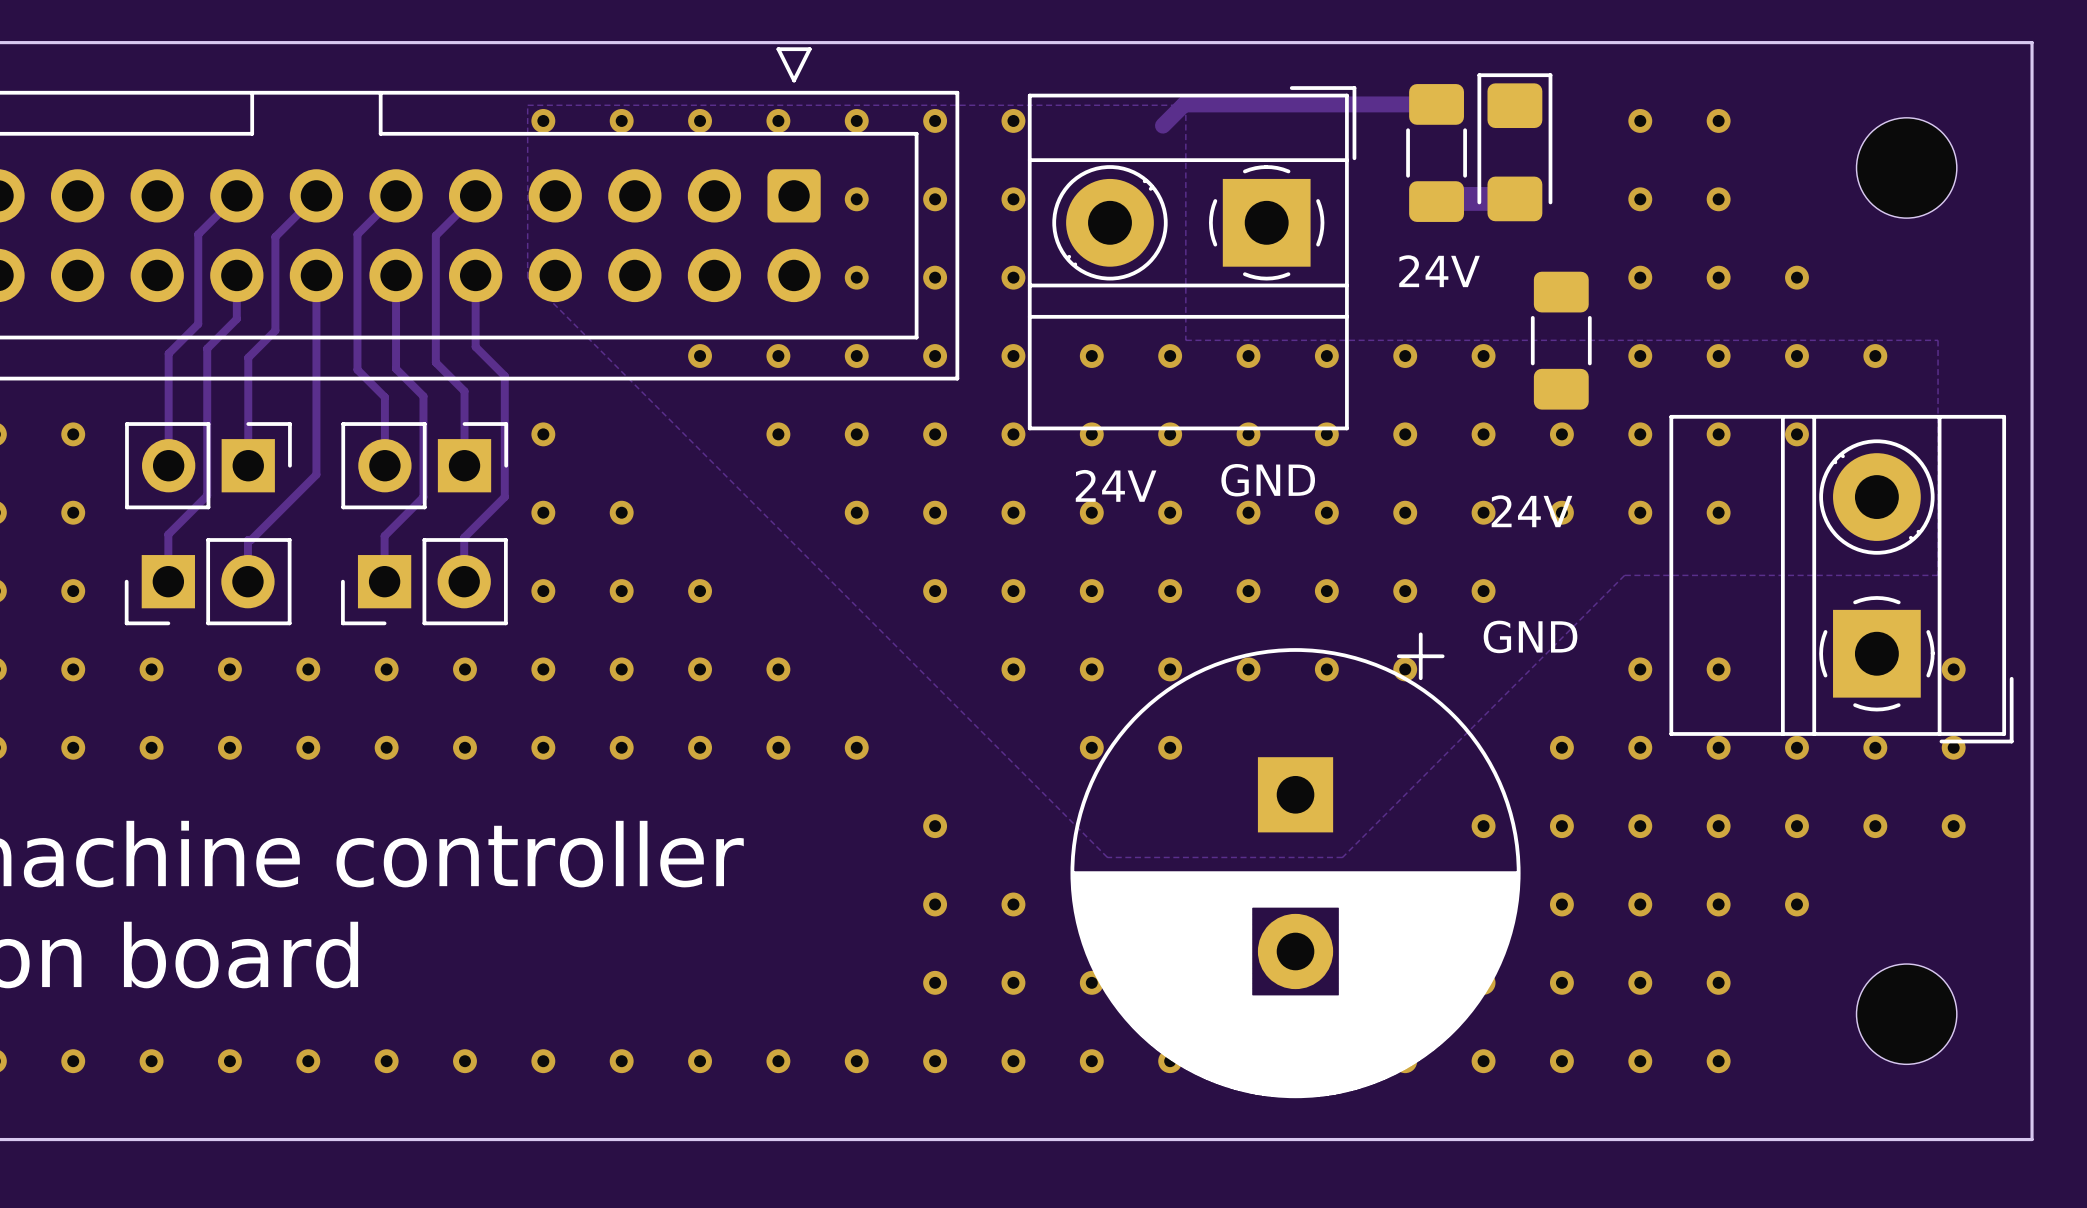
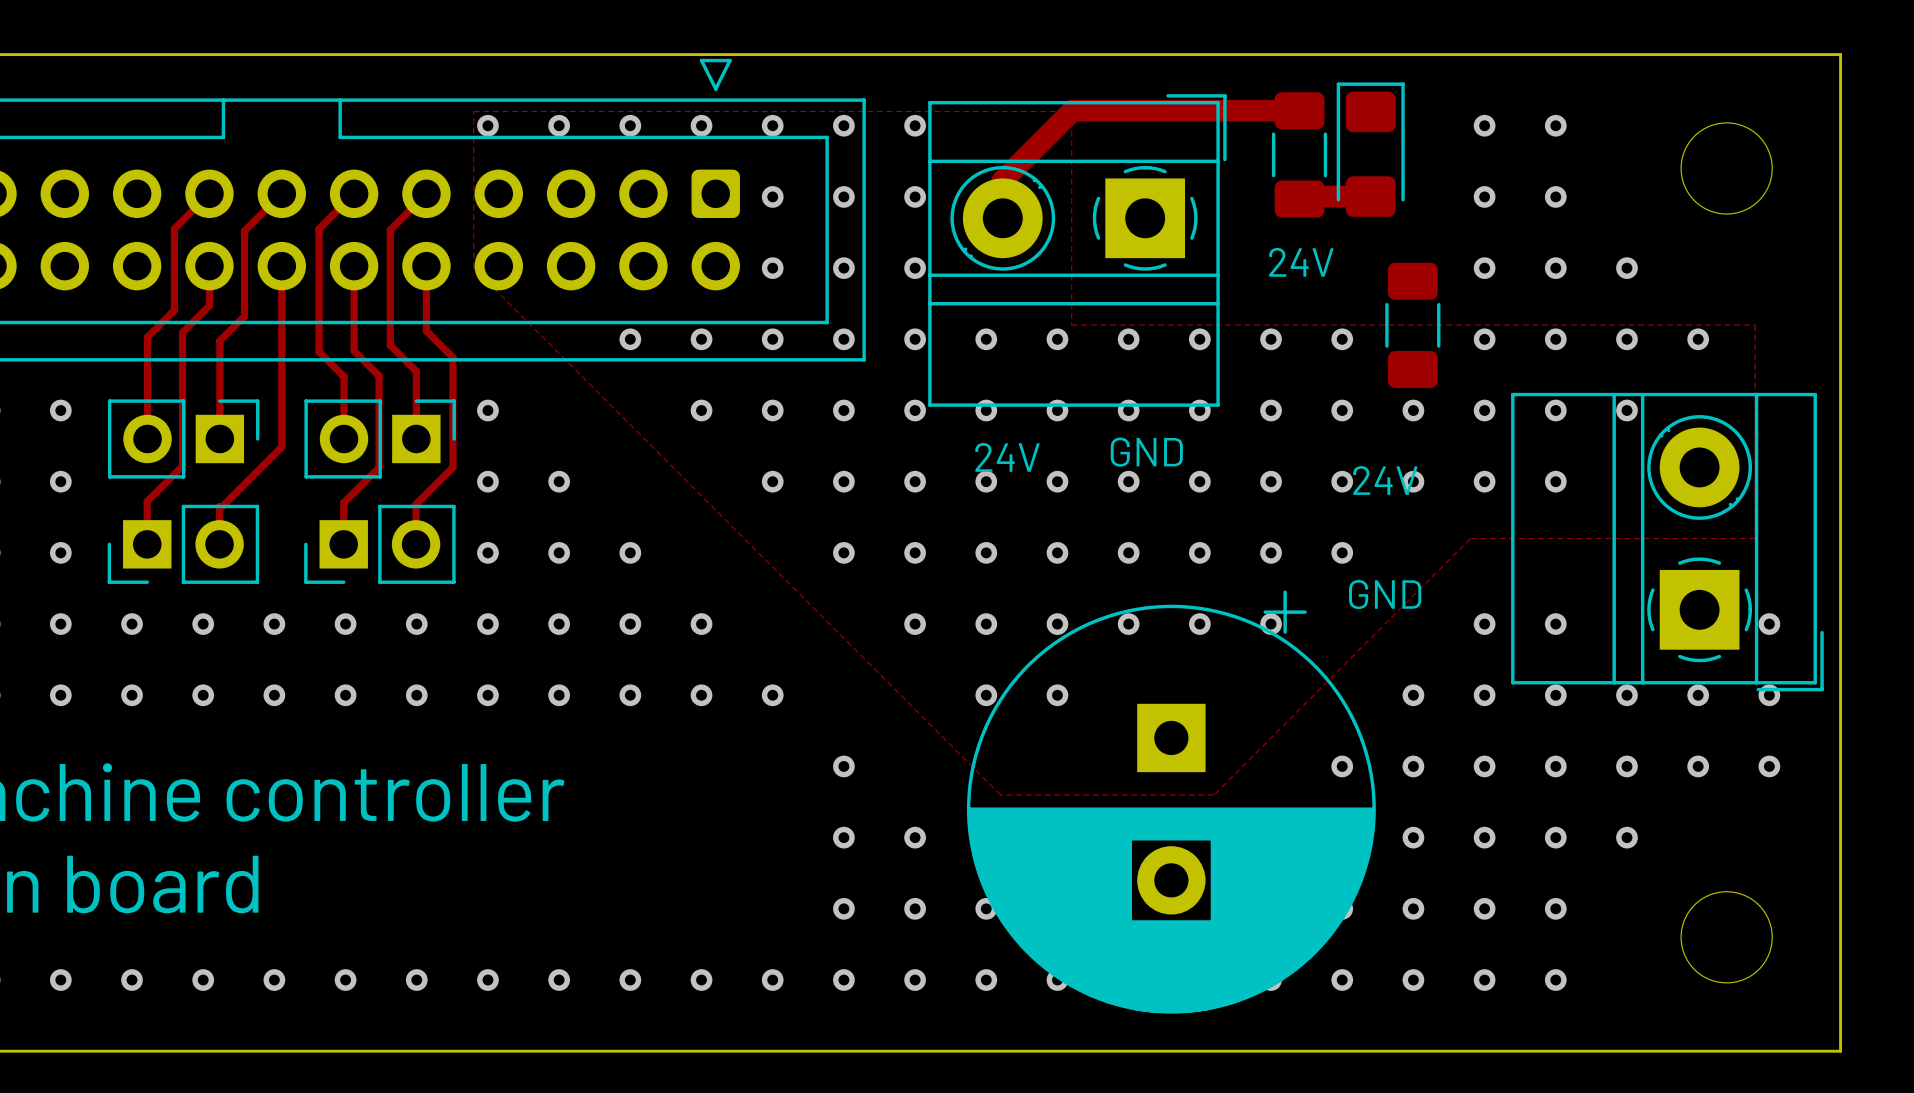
track: (1186, 104) (1184, 104) (1162, 125) -> (1072, 110) (1002, 180) (1002, 218)
track width: thin (1186, 104) (1436, 104) -> thick (1072, 110) (1299, 110)

